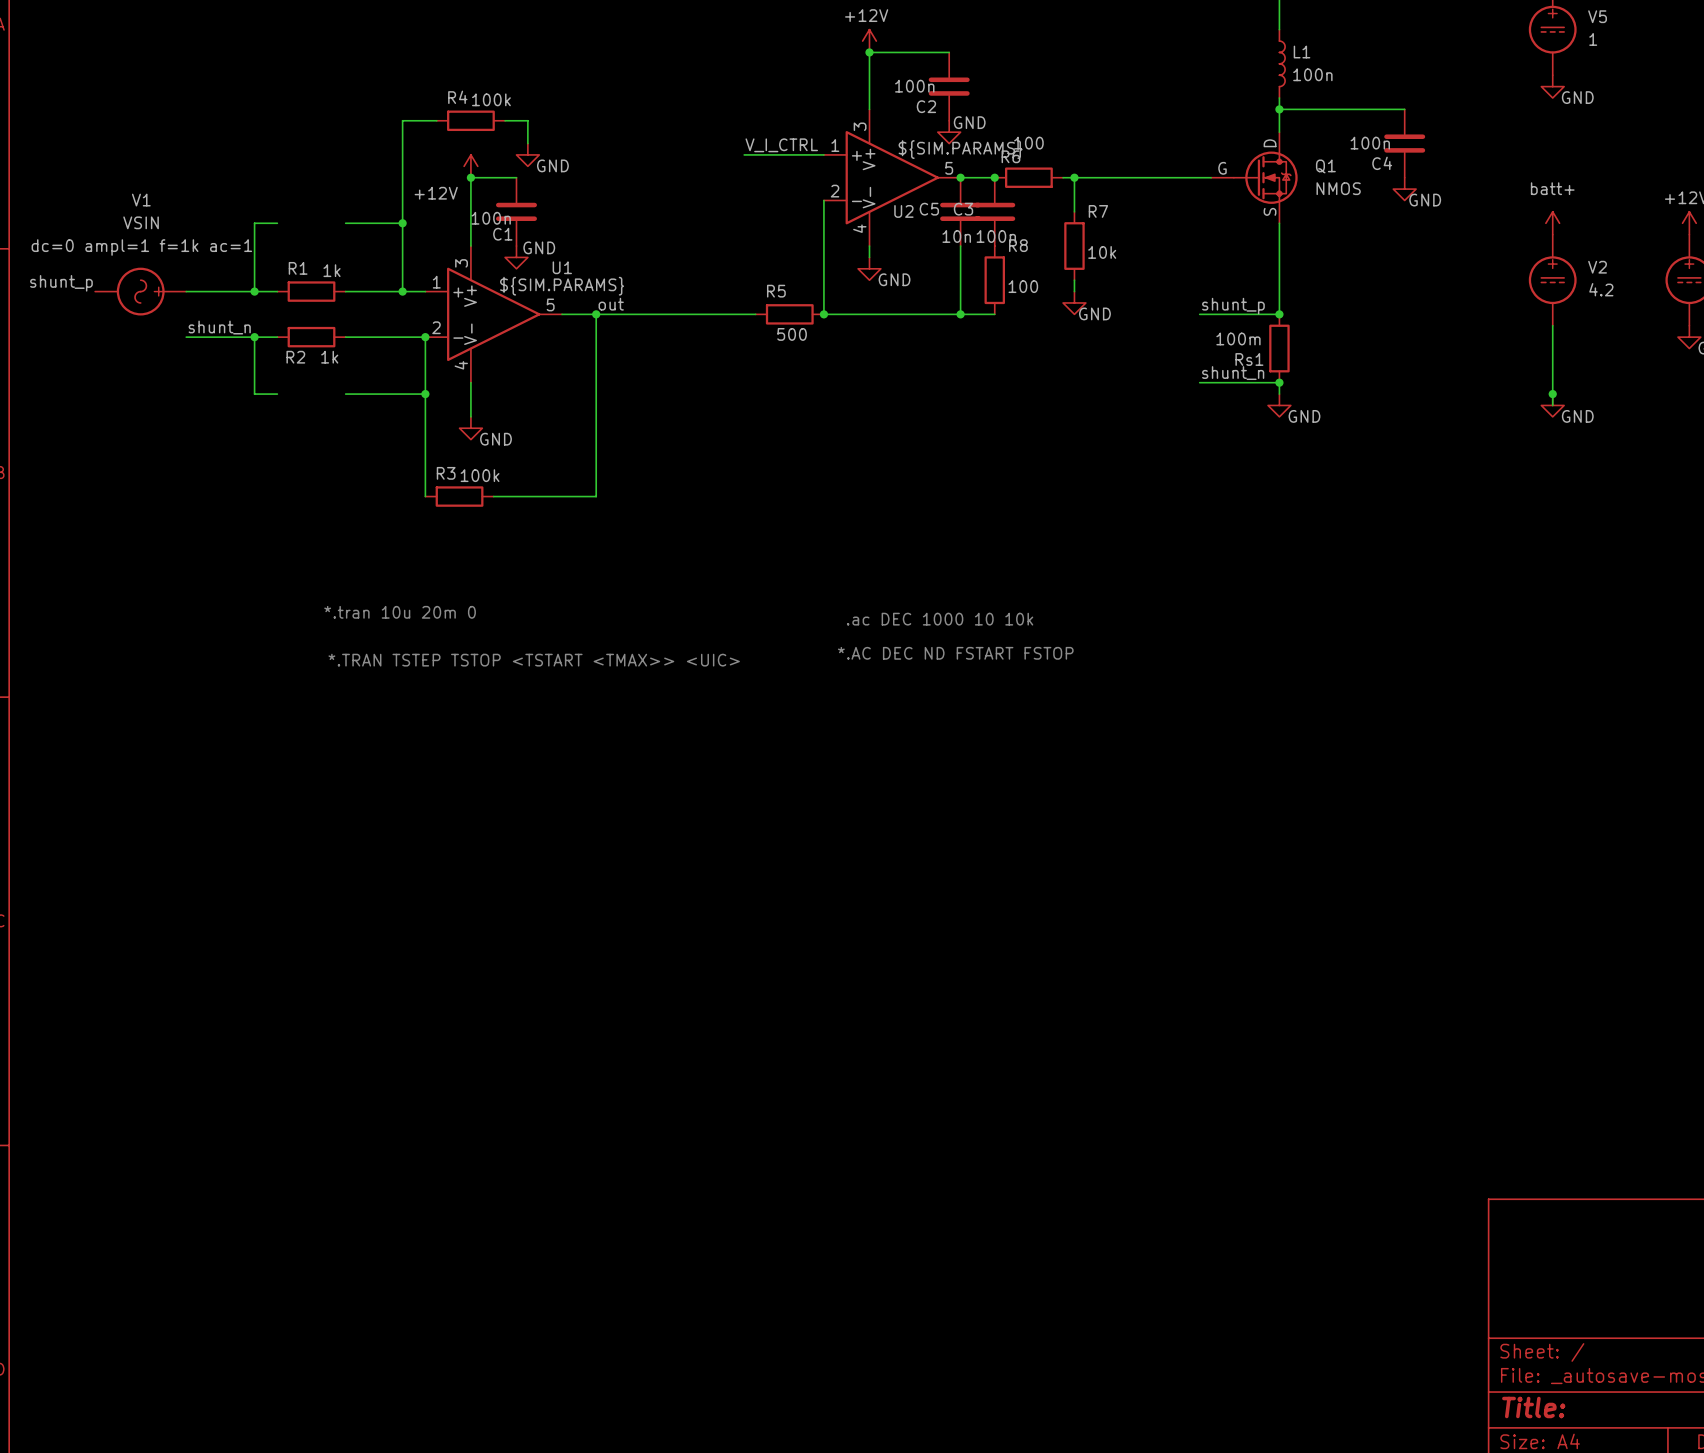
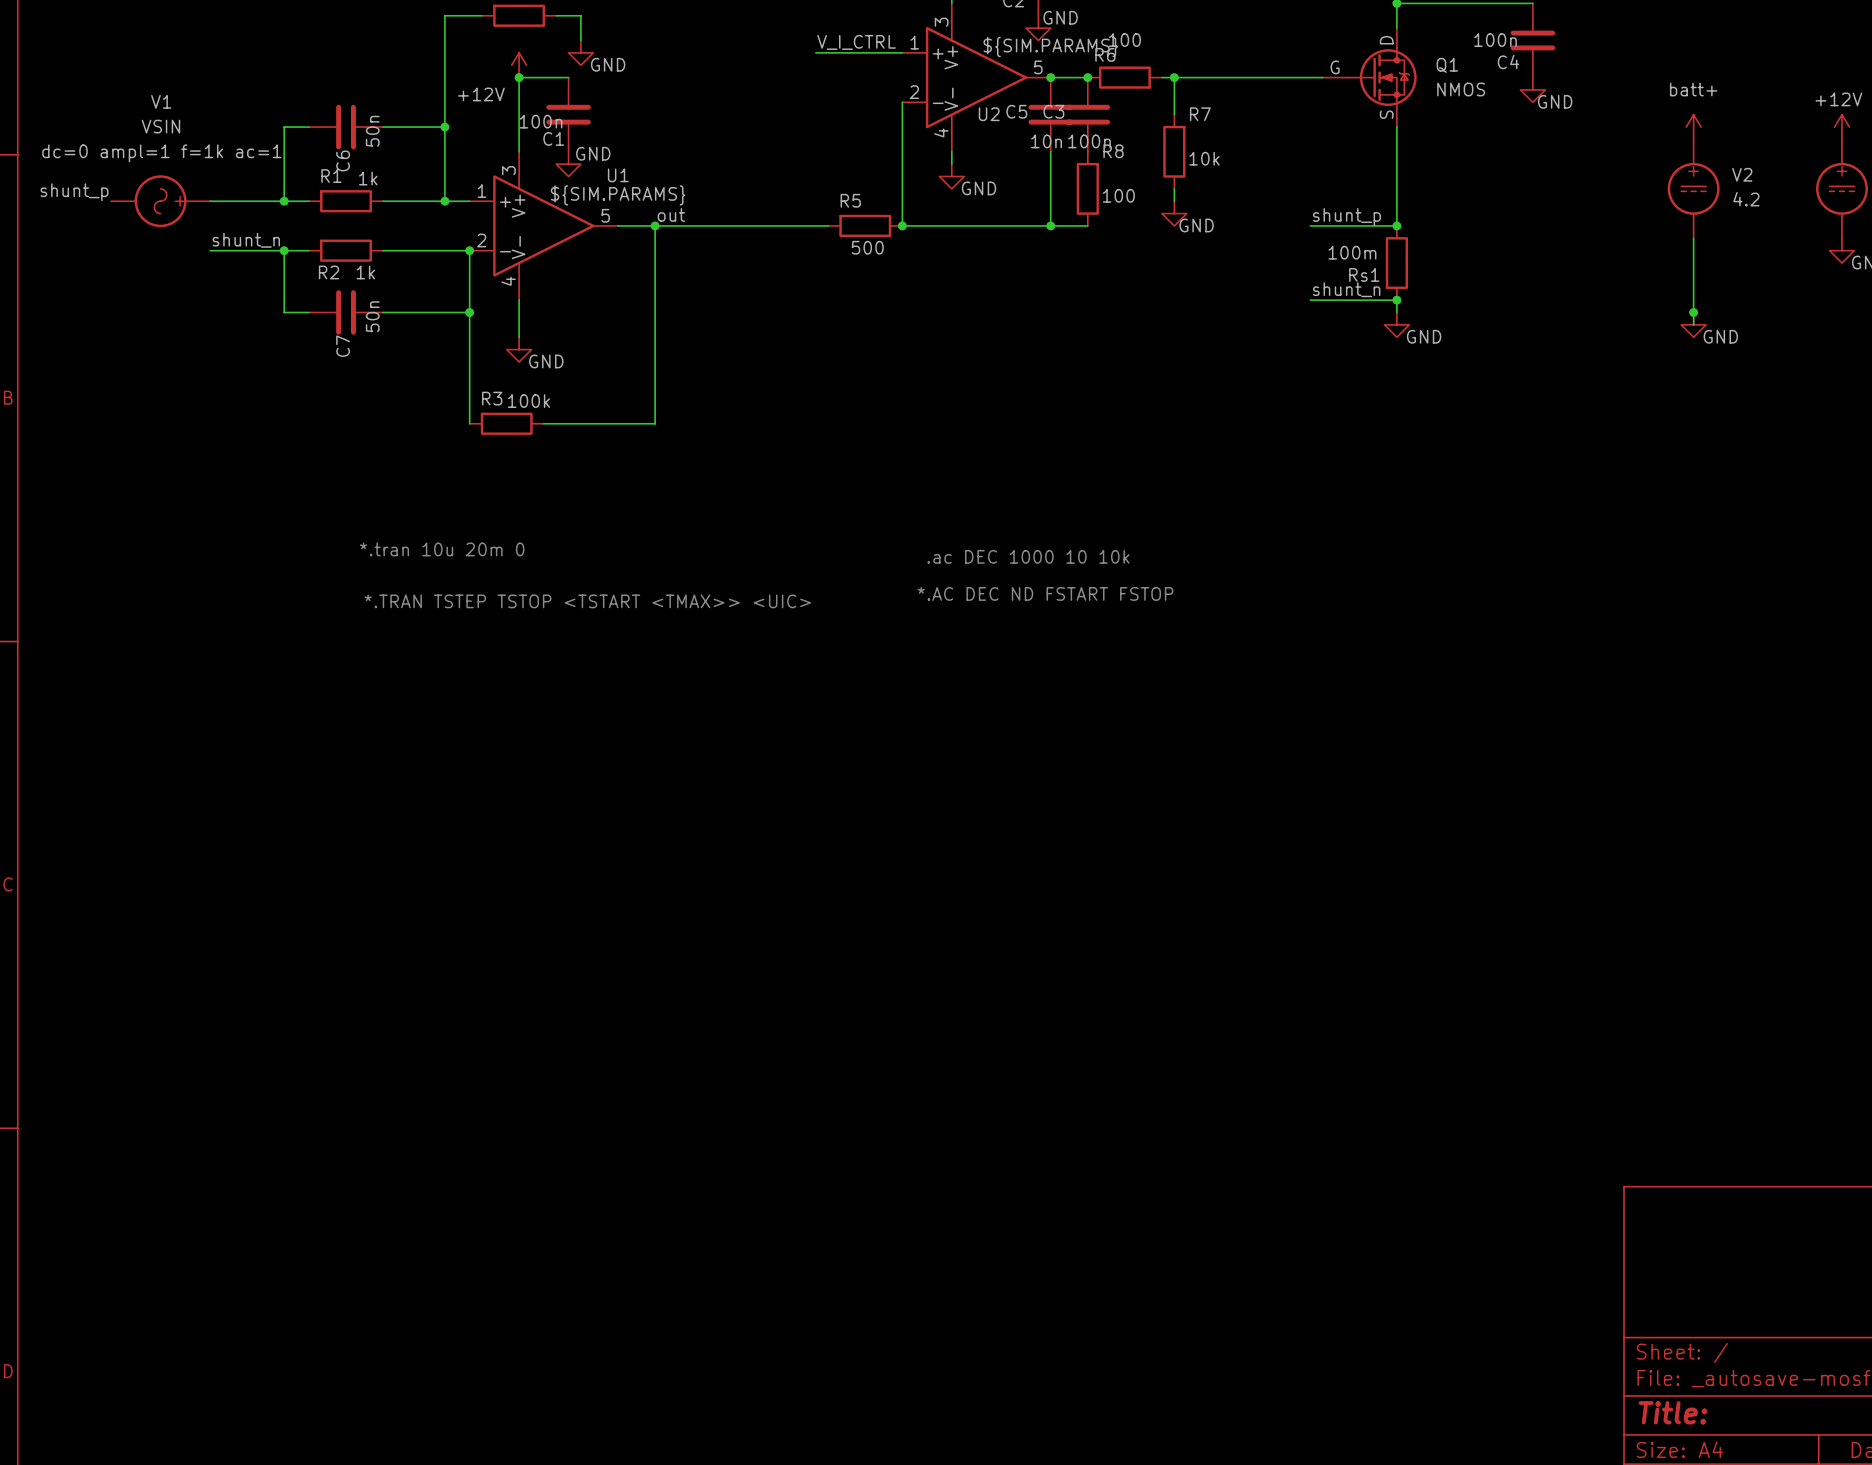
C6: none -> 50n (346, 127)
C7: none -> 50n (346, 312)

